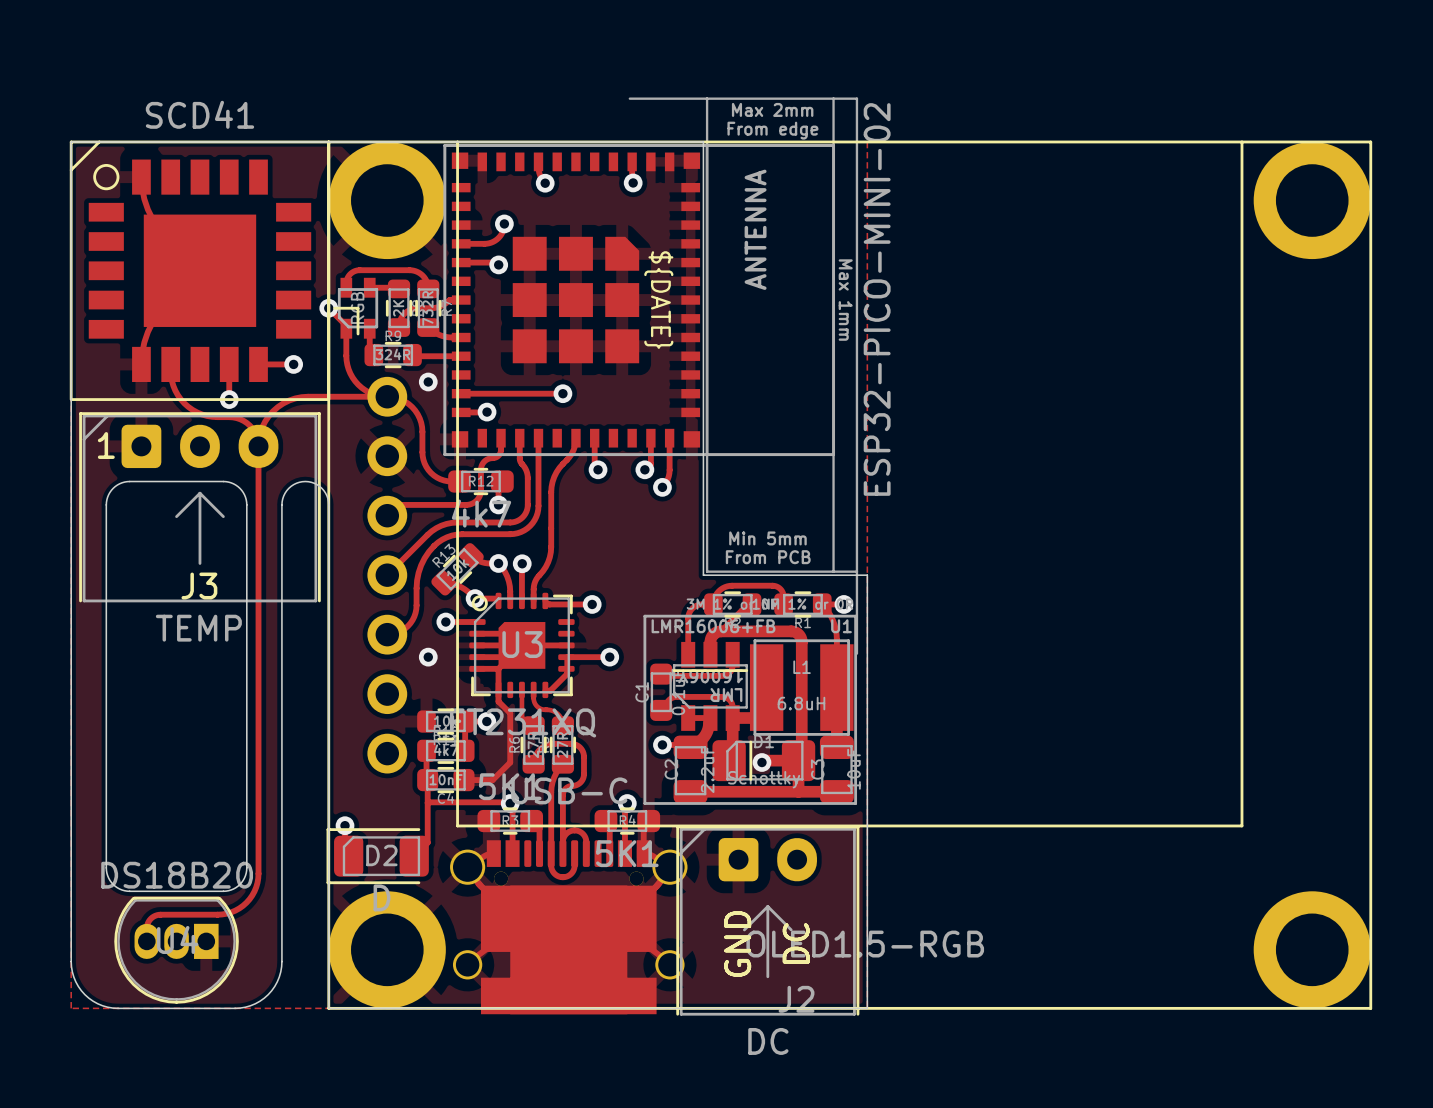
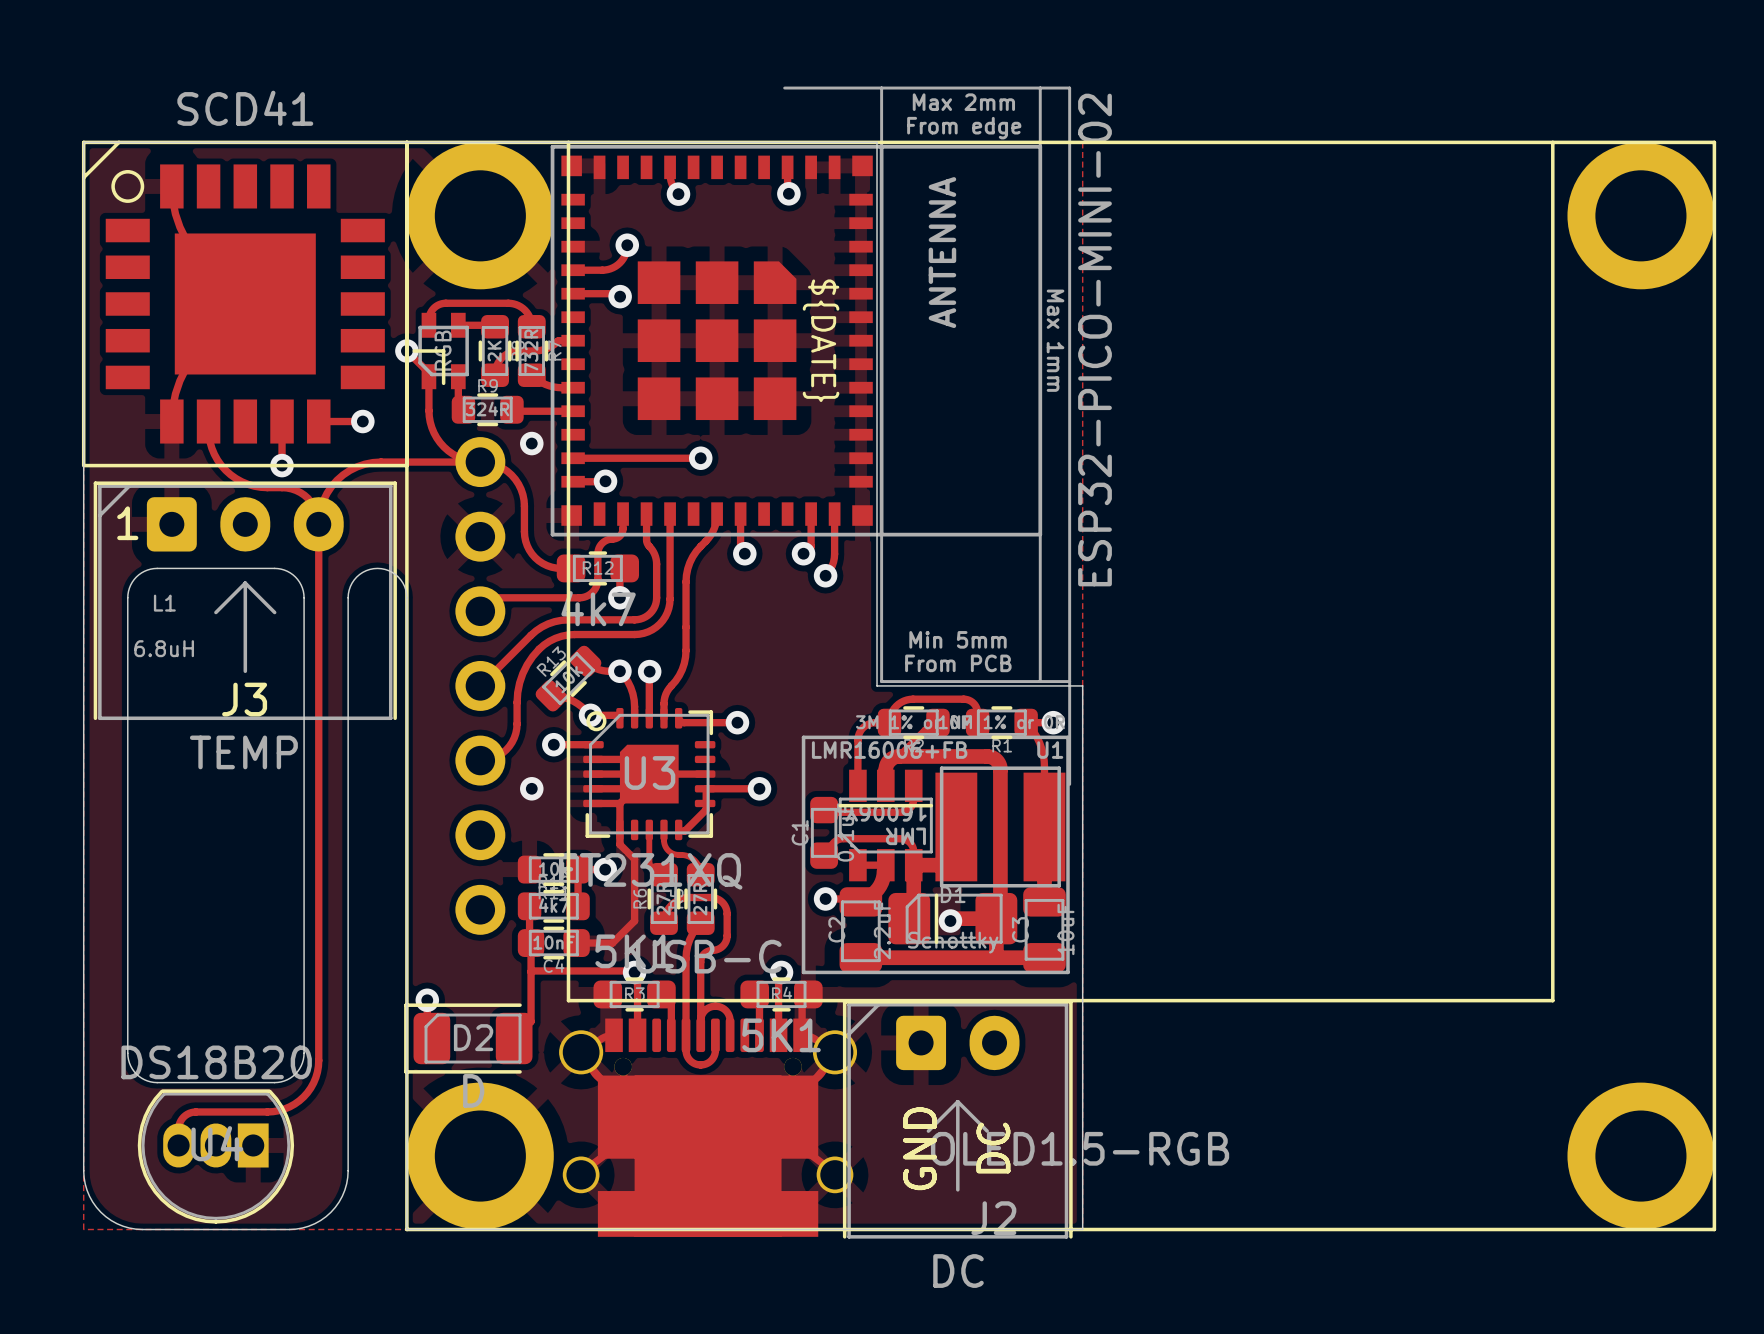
L1 position: (801, 685) -> (164, 625)

